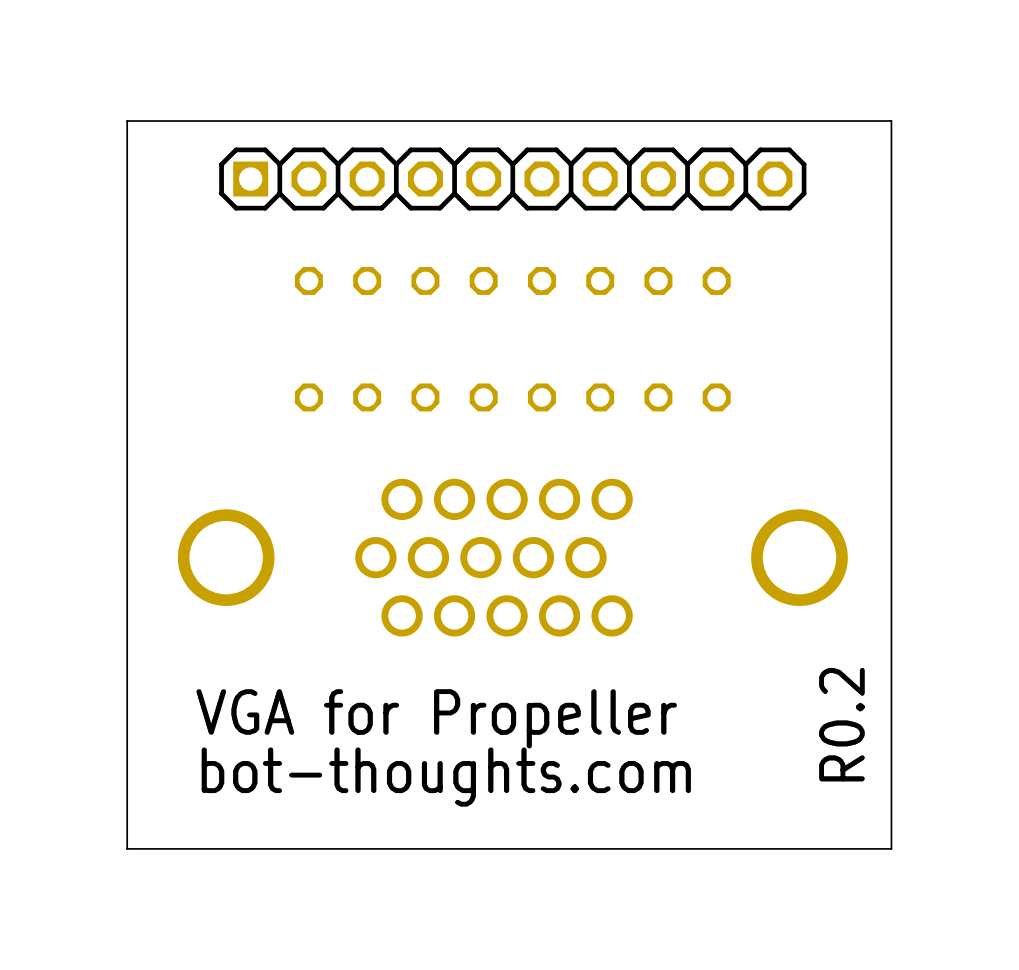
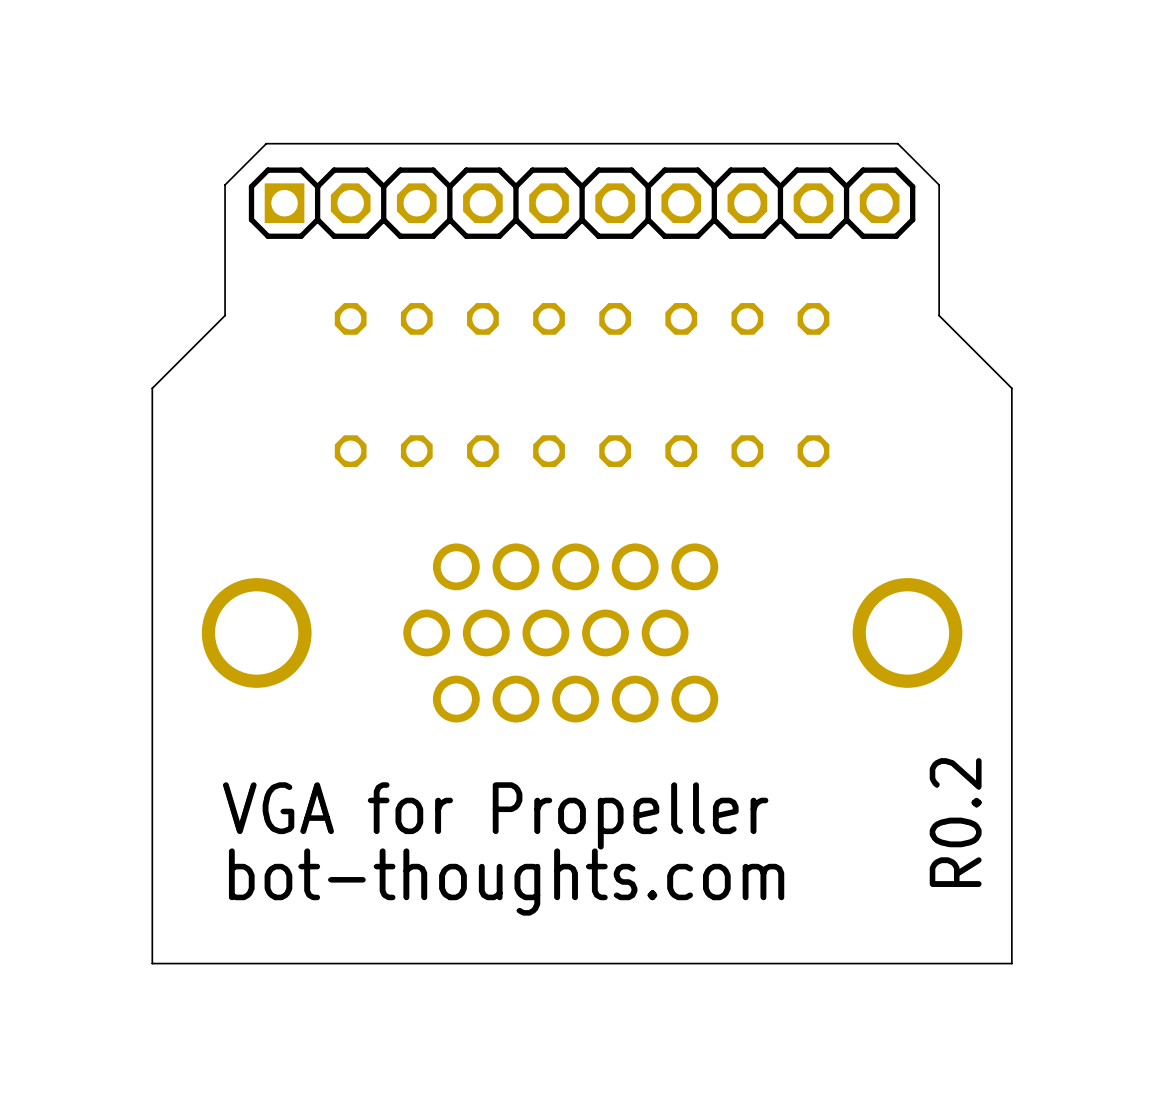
board edge: (891, 342) (891, 120) (127, 120) (127, 848) (134, 848) -> (1011, 388) (939, 315) (939, 184) (897, 143) (266, 143) (225, 184) (225, 315) (152, 388) (152, 963)

